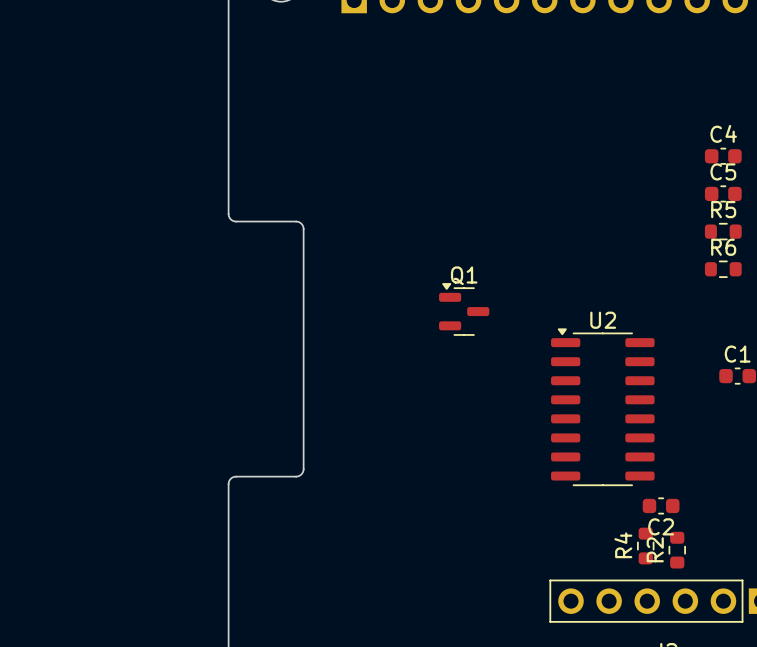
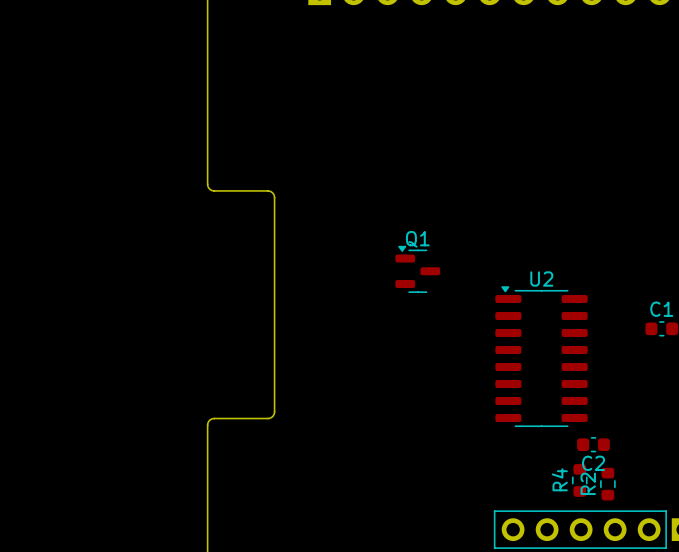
C4: (723, 156) -> none
C5: (723, 193) -> none
R5: (723, 231) -> none
R6: (723, 269) -> none

